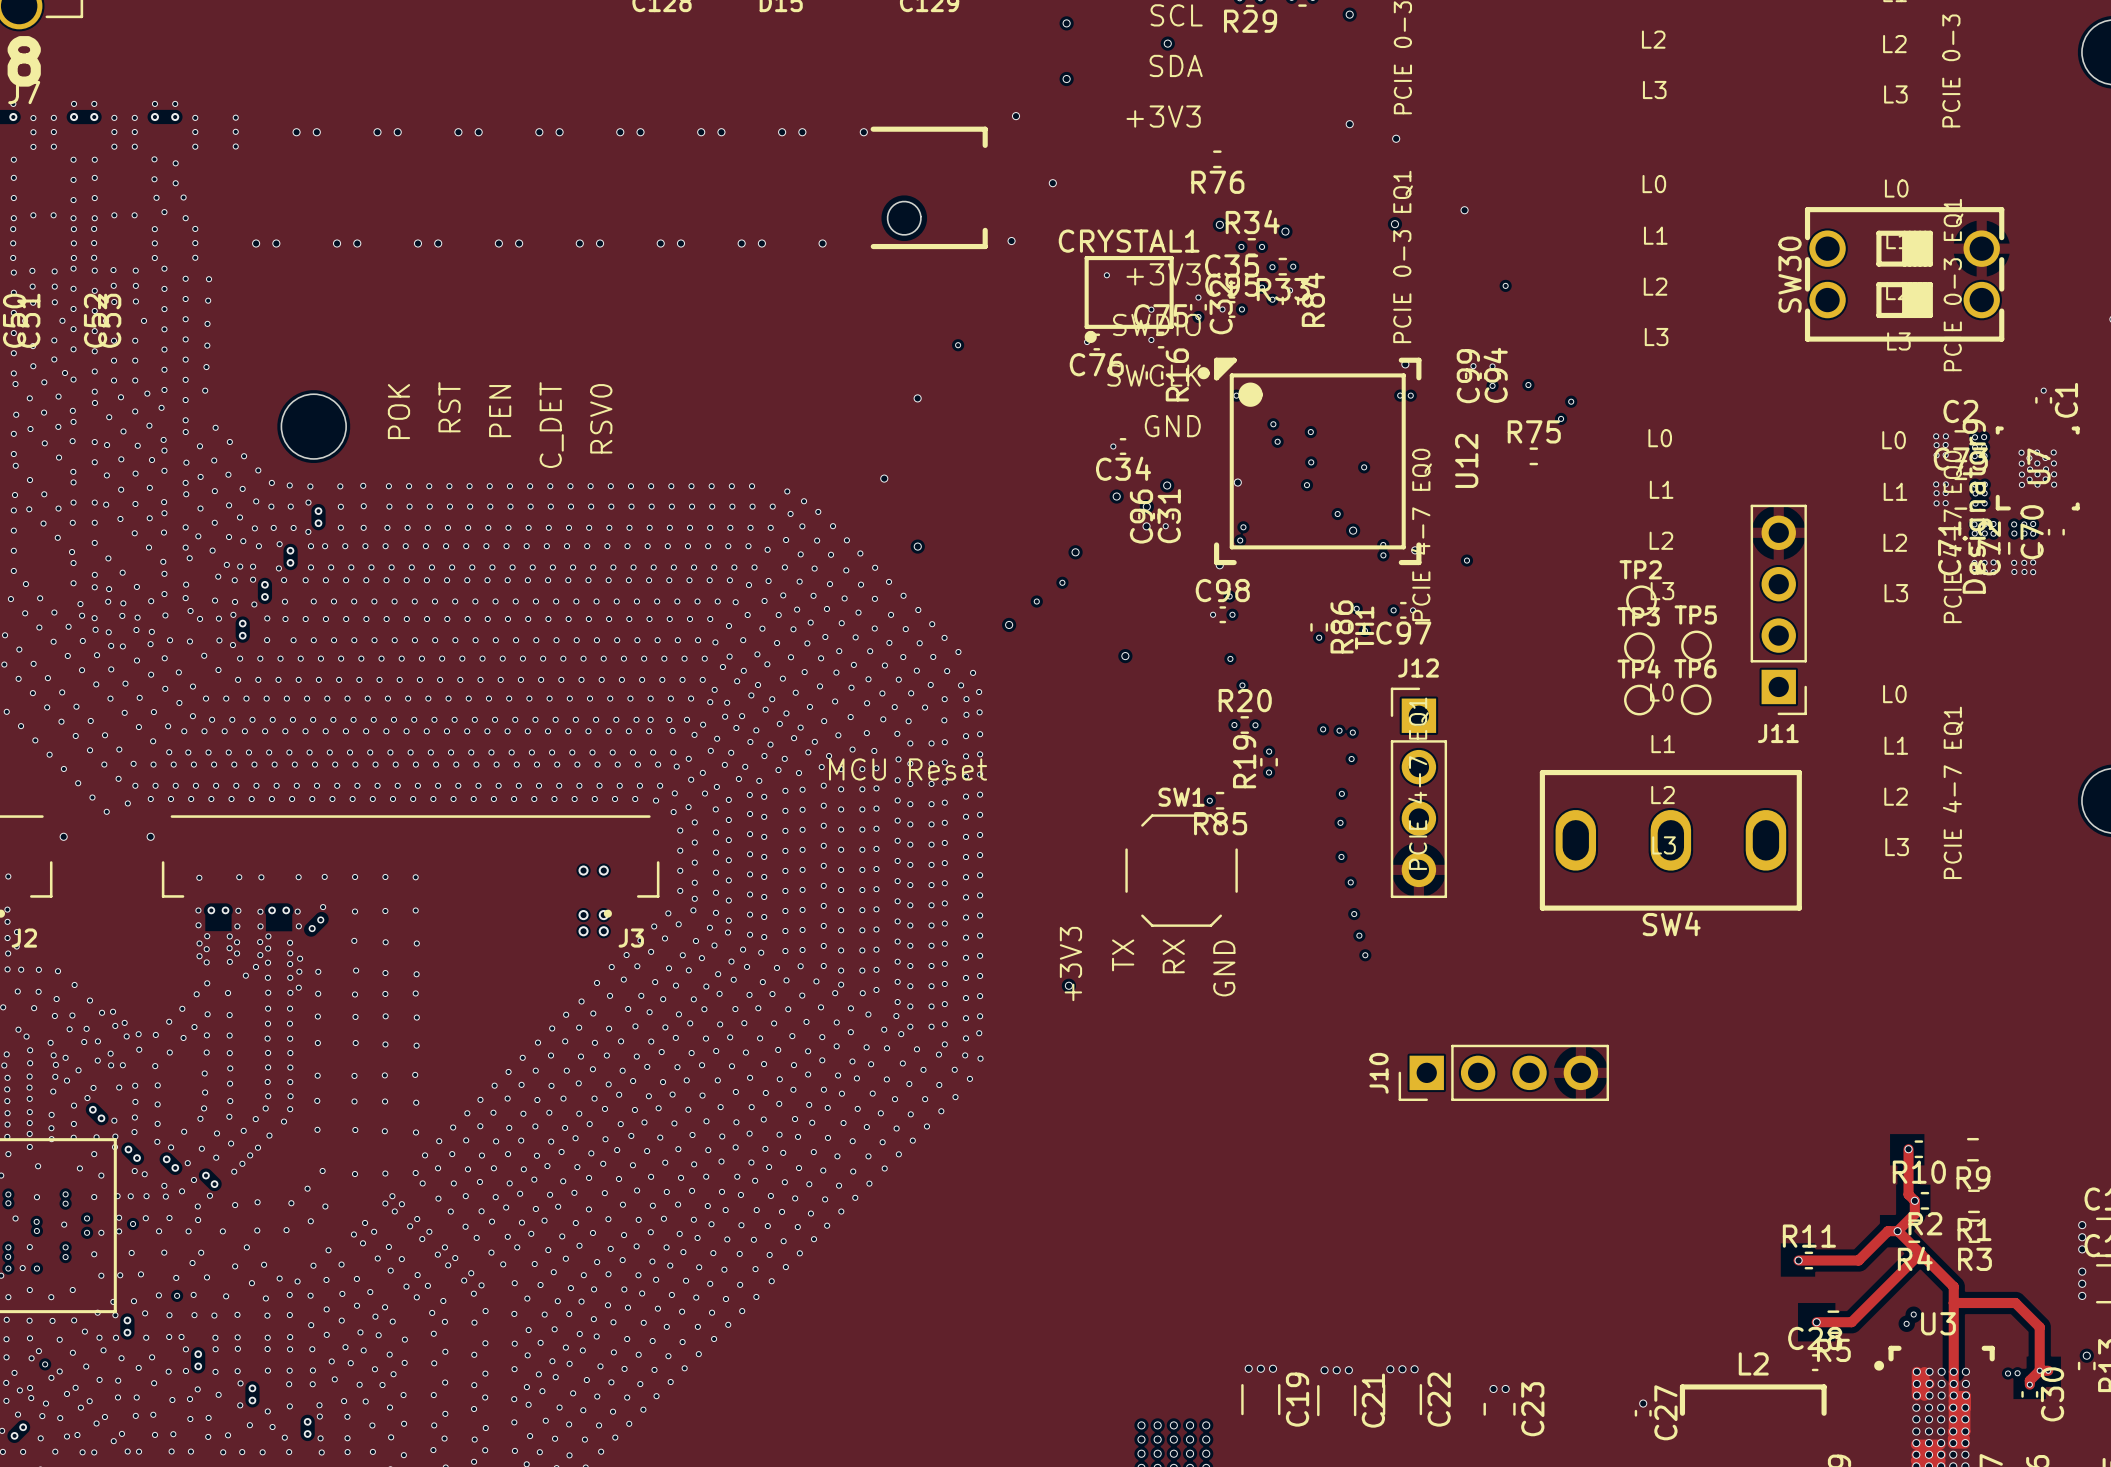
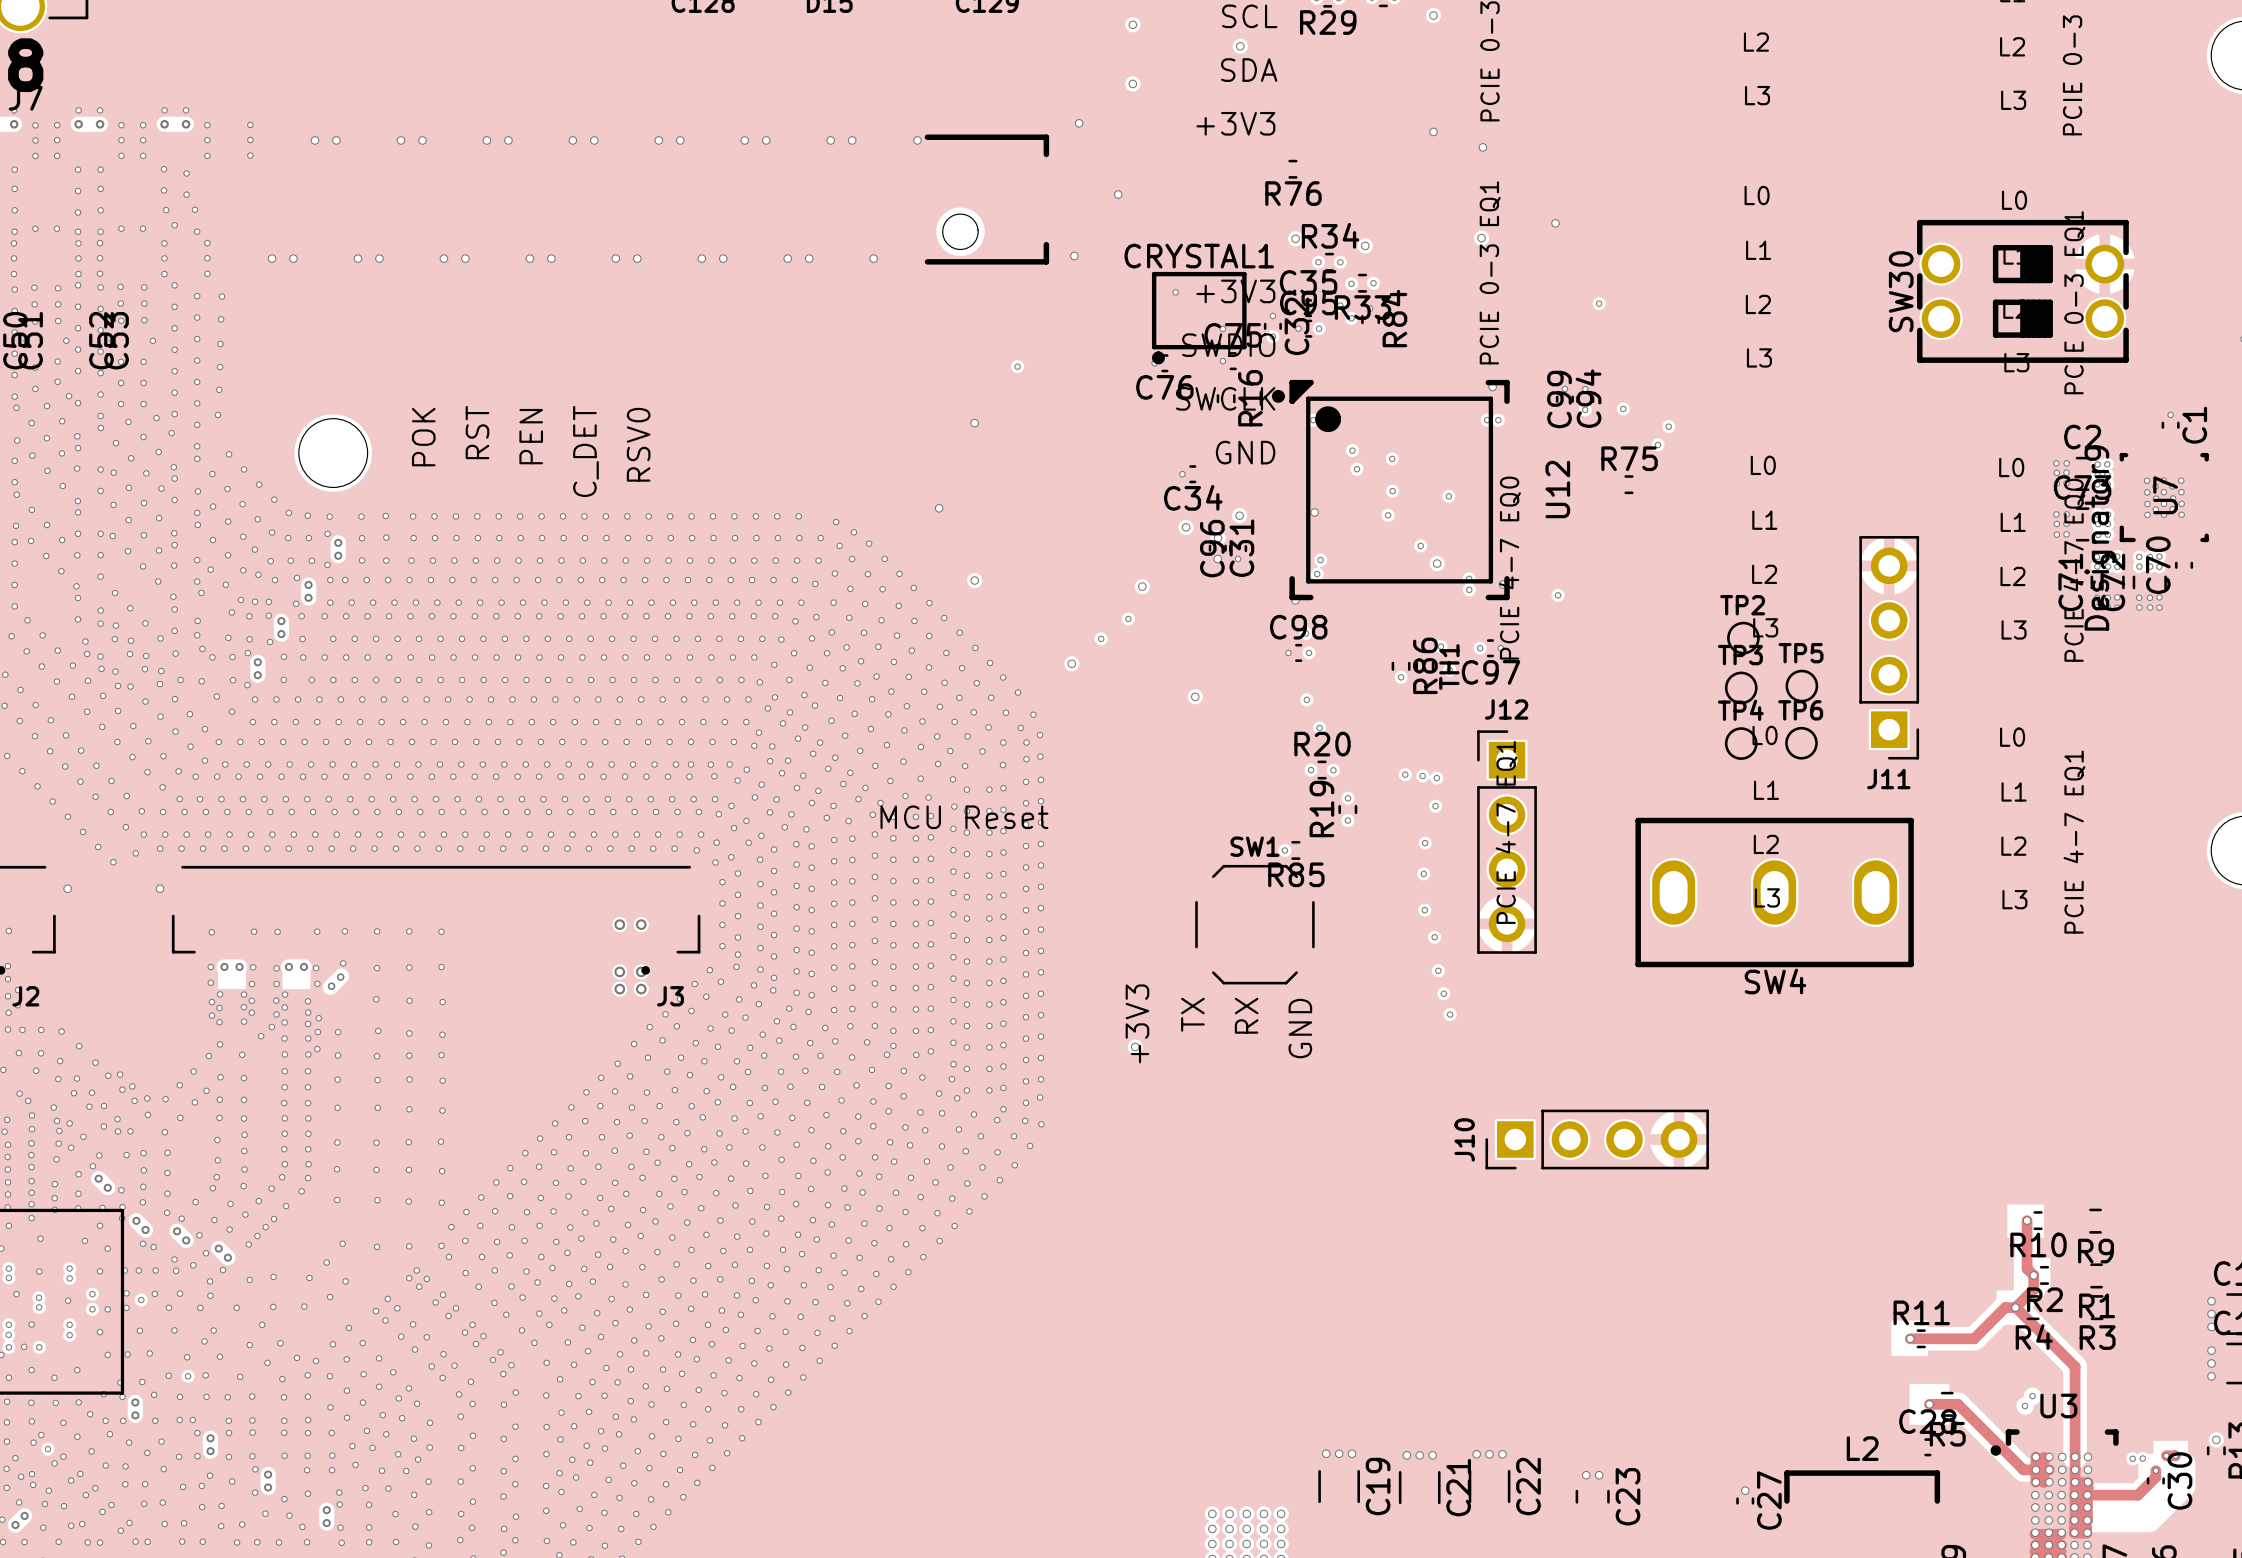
track: (1920, 1253) (1851, 1322) (1843, 1322) -> (2035, 1469) (2023, 1469) (1957, 1404)
track: (1953, 1303) (2015, 1303) (2039, 1327) (2039, 1370) (2029, 1380) (2029, 1384) -> (2087, 1495) (2137, 1495) (2155, 1477) (2155, 1470)

